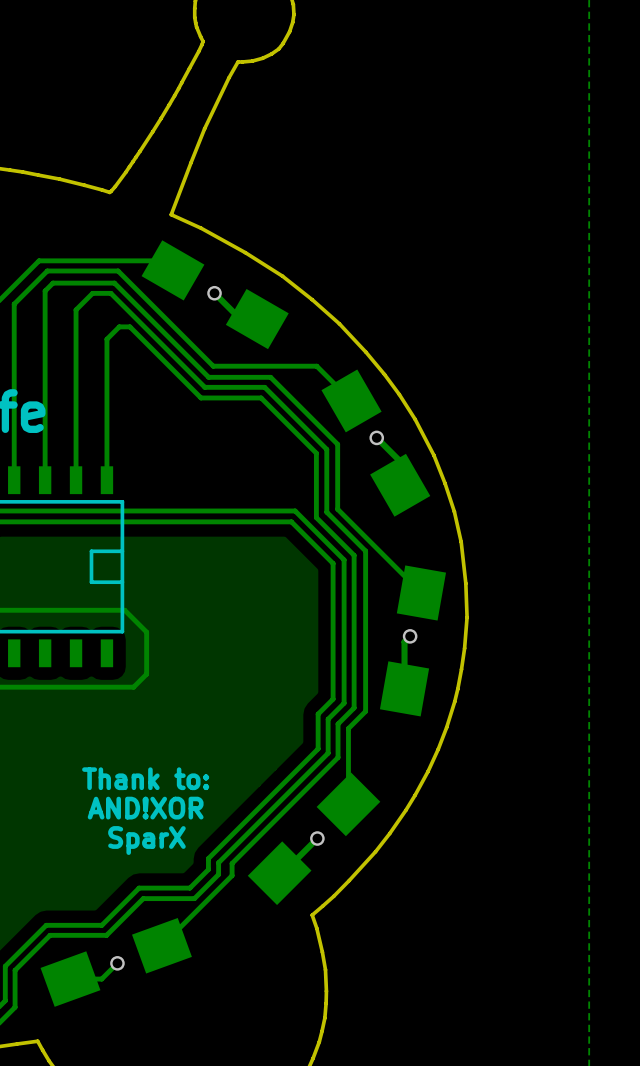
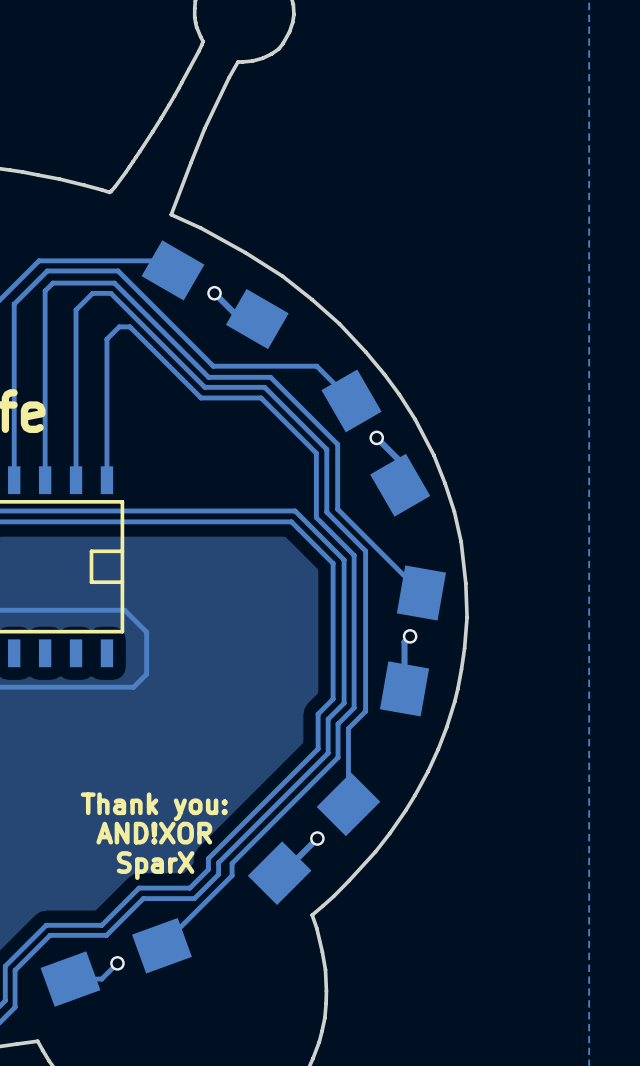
text: Thank to: (145, 778) -> none
text: AND!XOR (145, 808) -> Thank you: (154, 806)
text: SparX (146, 840) -> AND!XOR (154, 833)
text: none -> SparX (155, 865)

